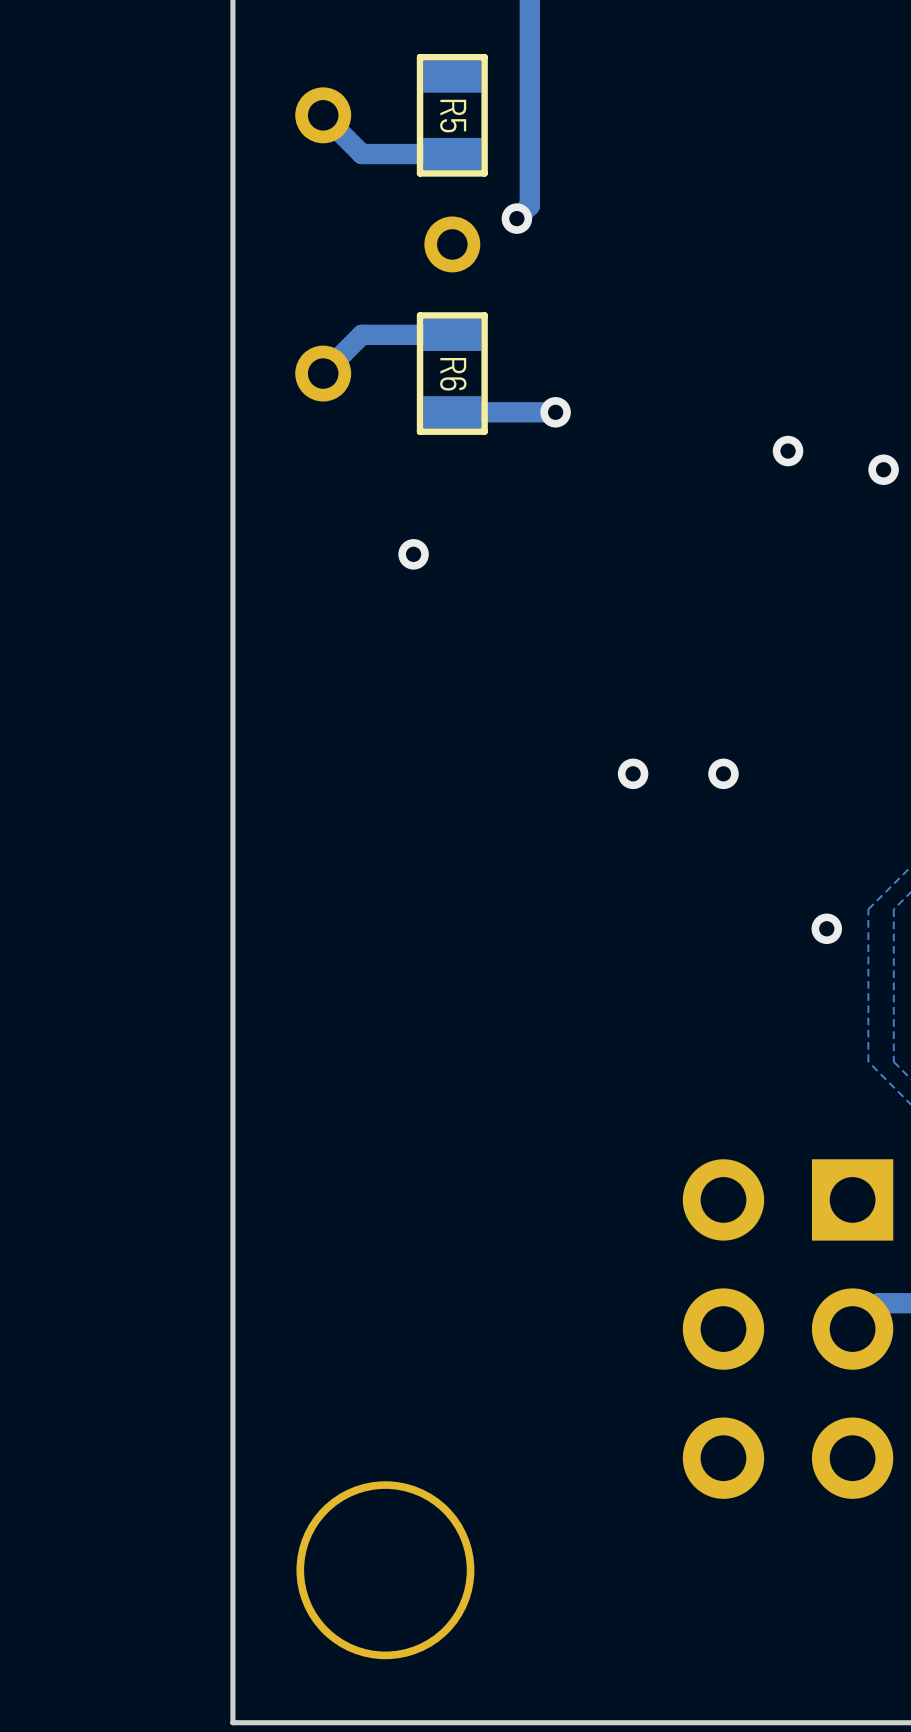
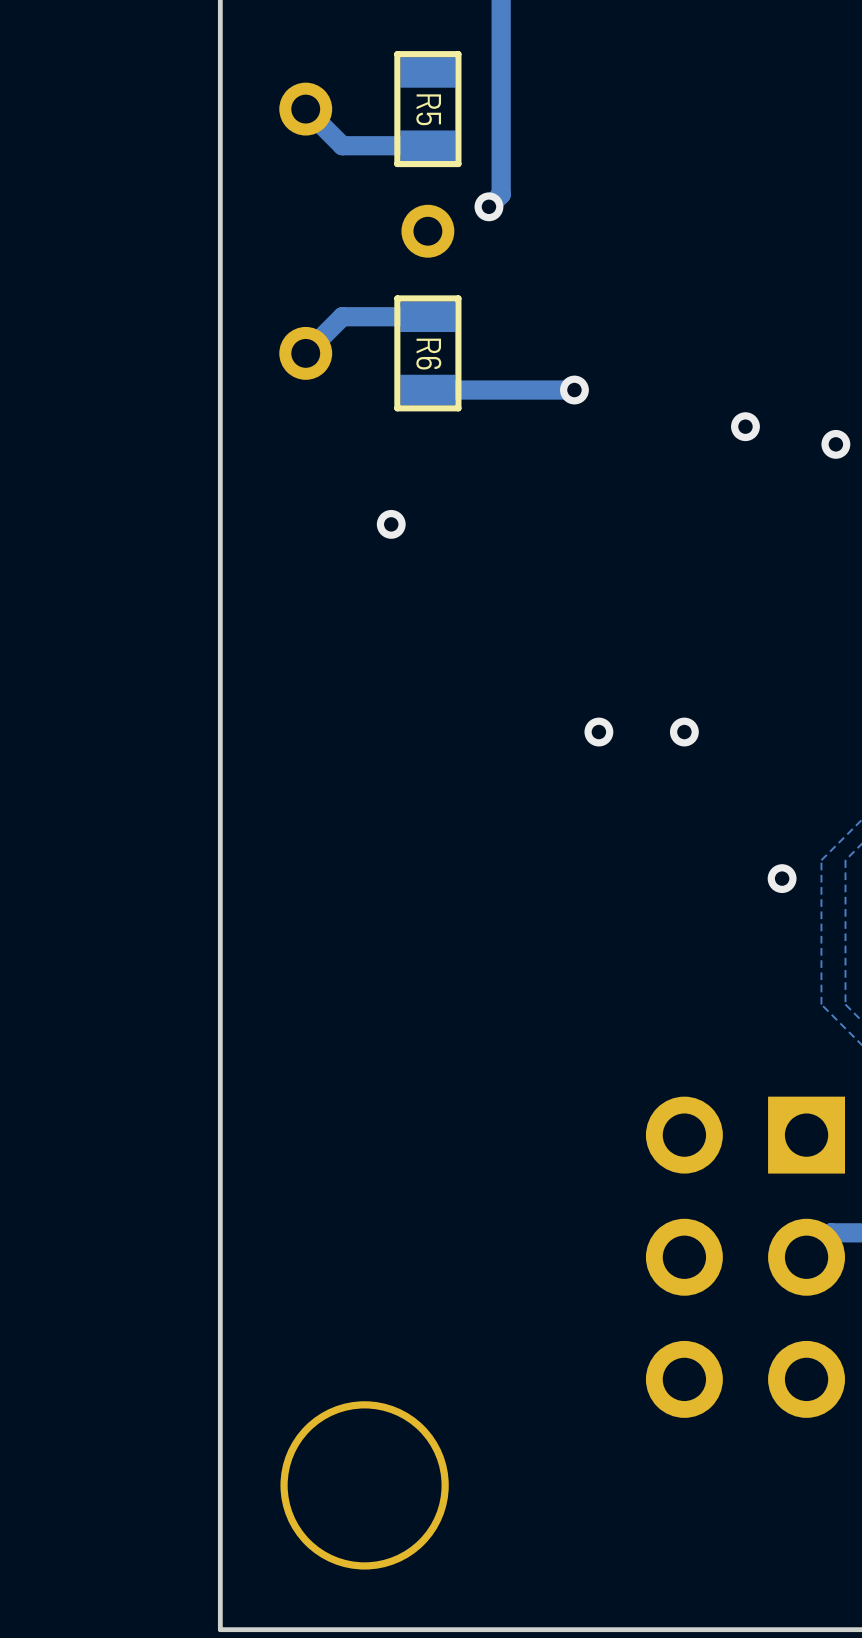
via position: (555, 412) -> (574, 390)
track: none -> (574, 390) (525, 390)

